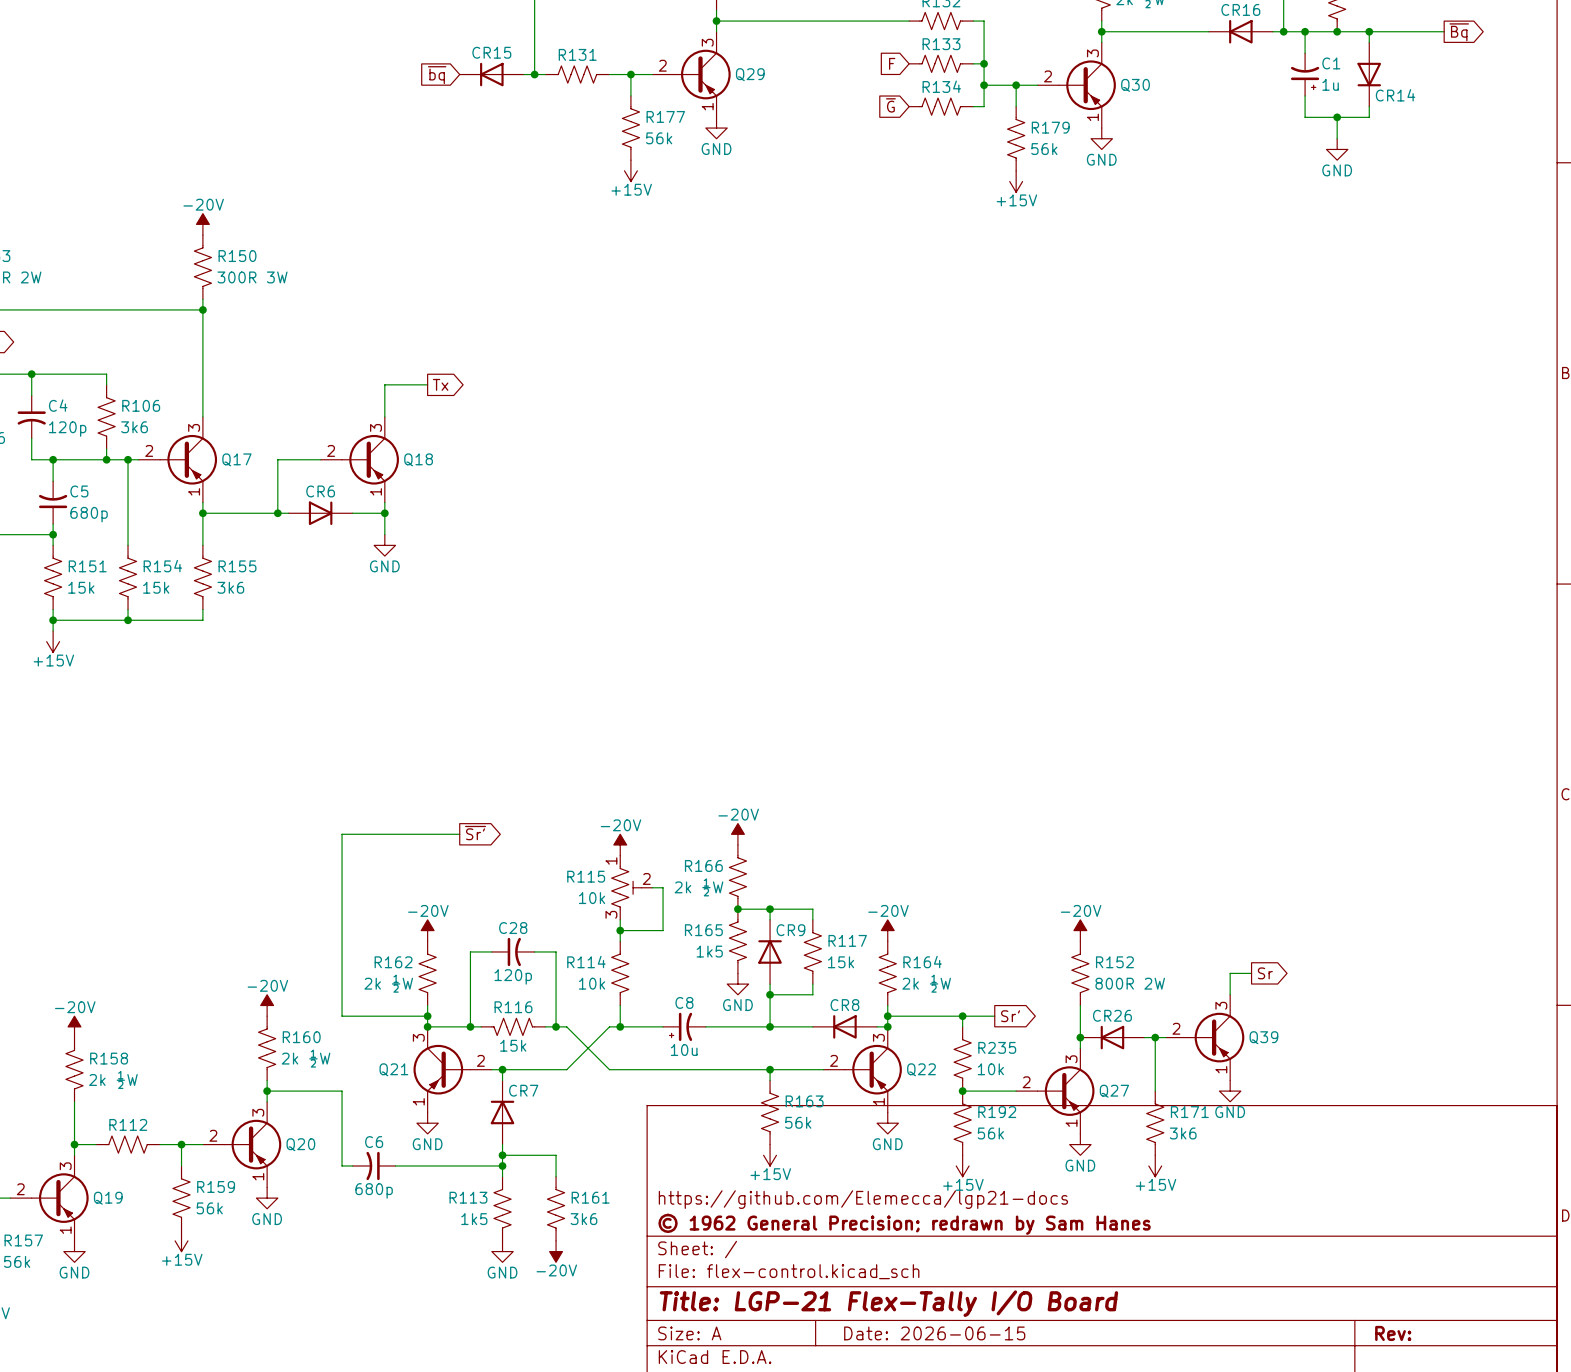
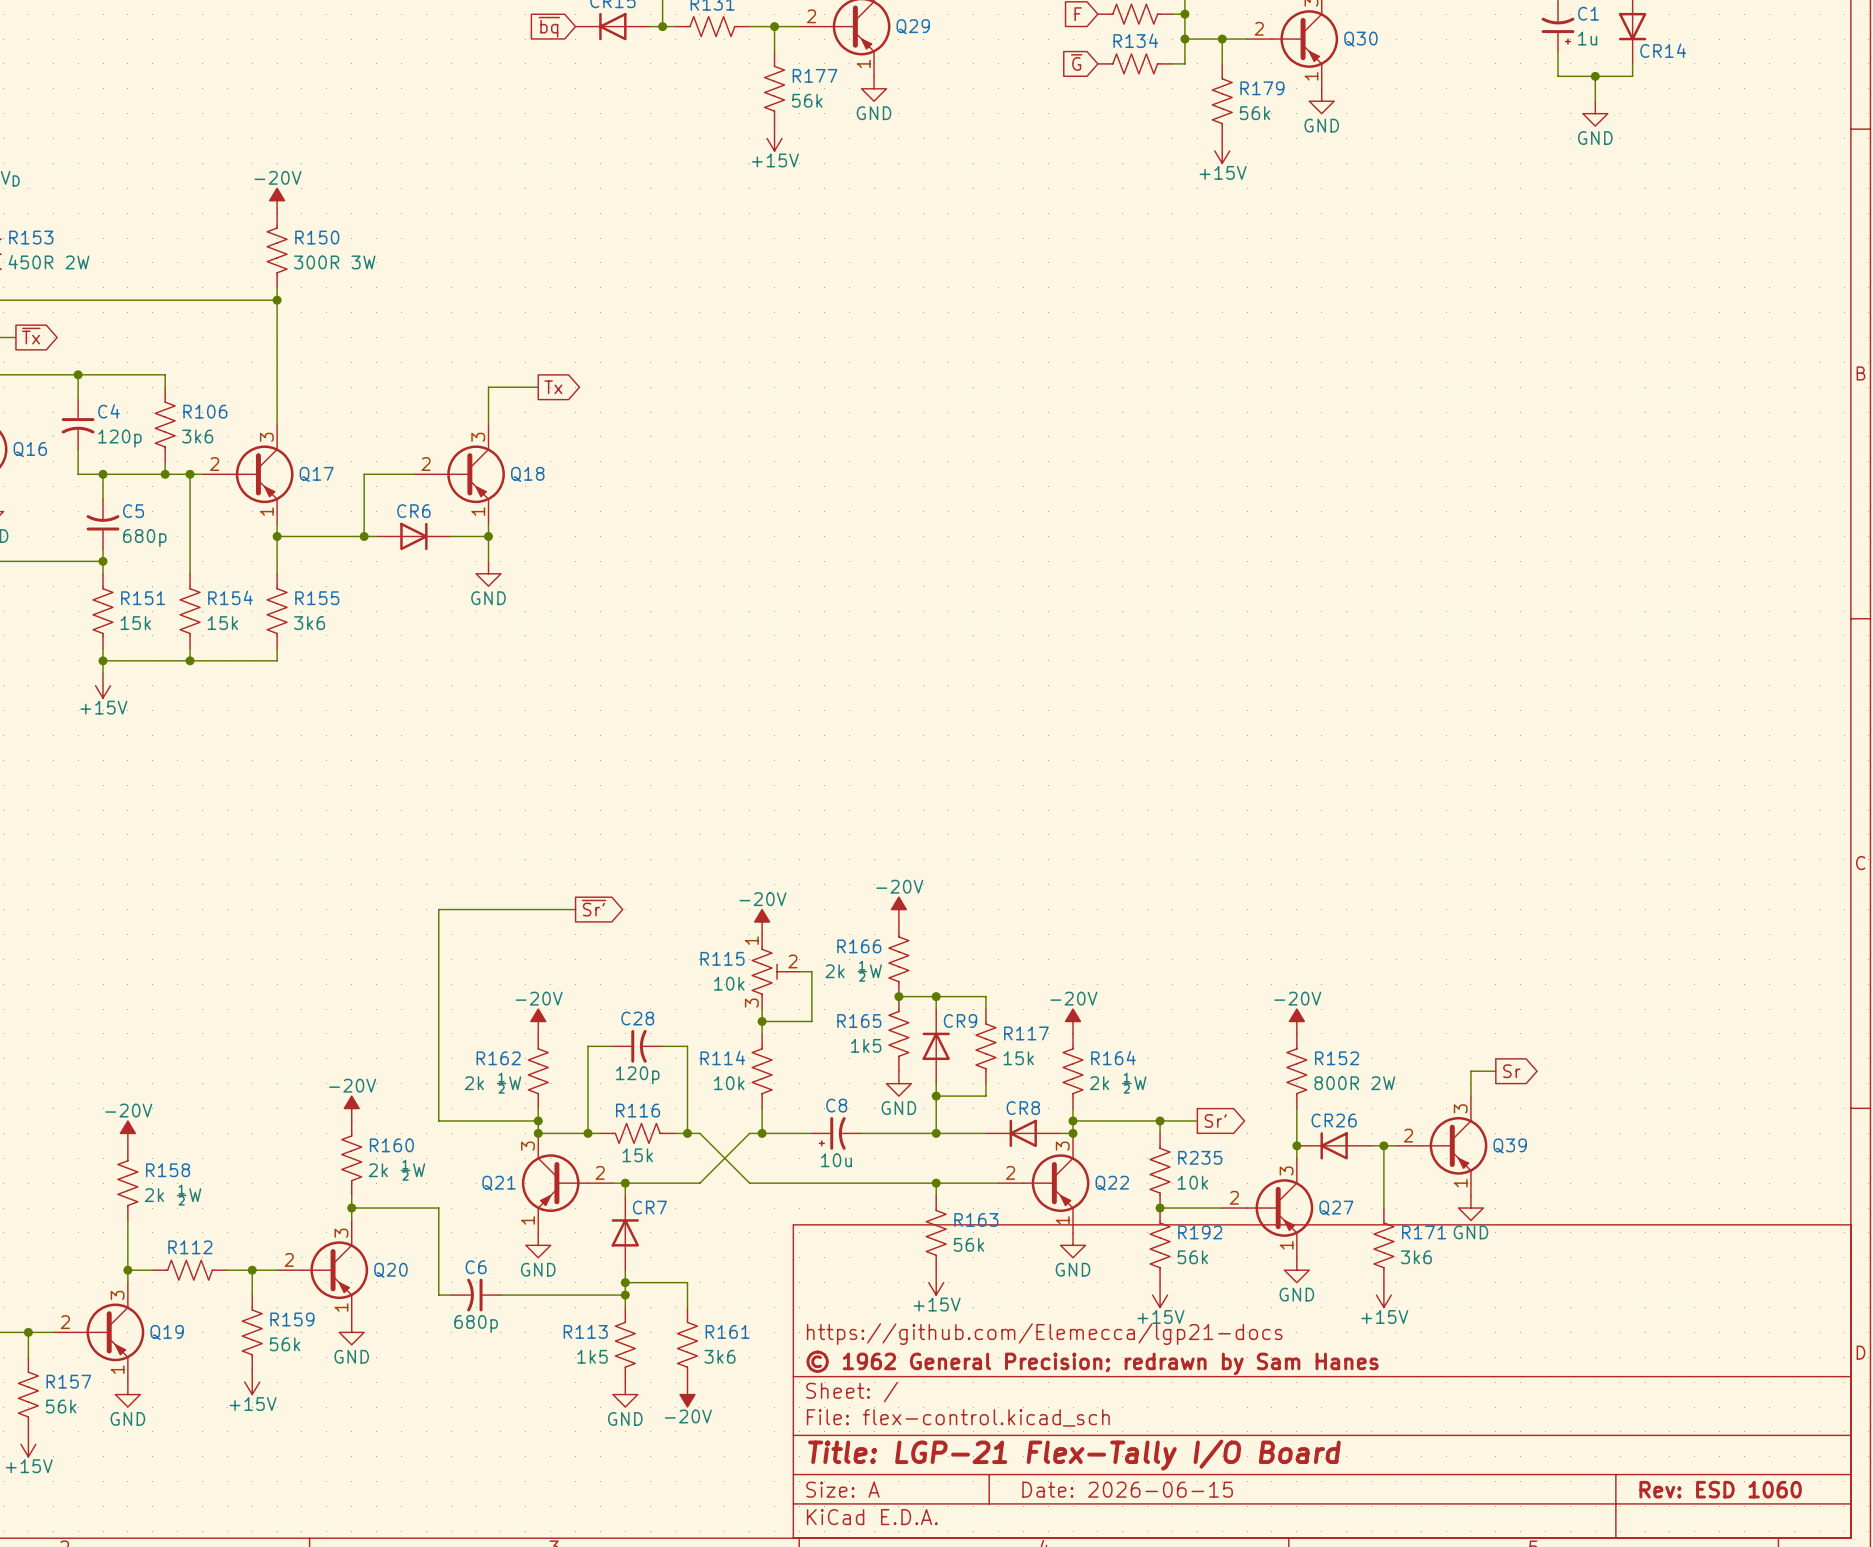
title block: Rev: (1393, 1333) -> Rev: ESD 1060 (1720, 1489)

